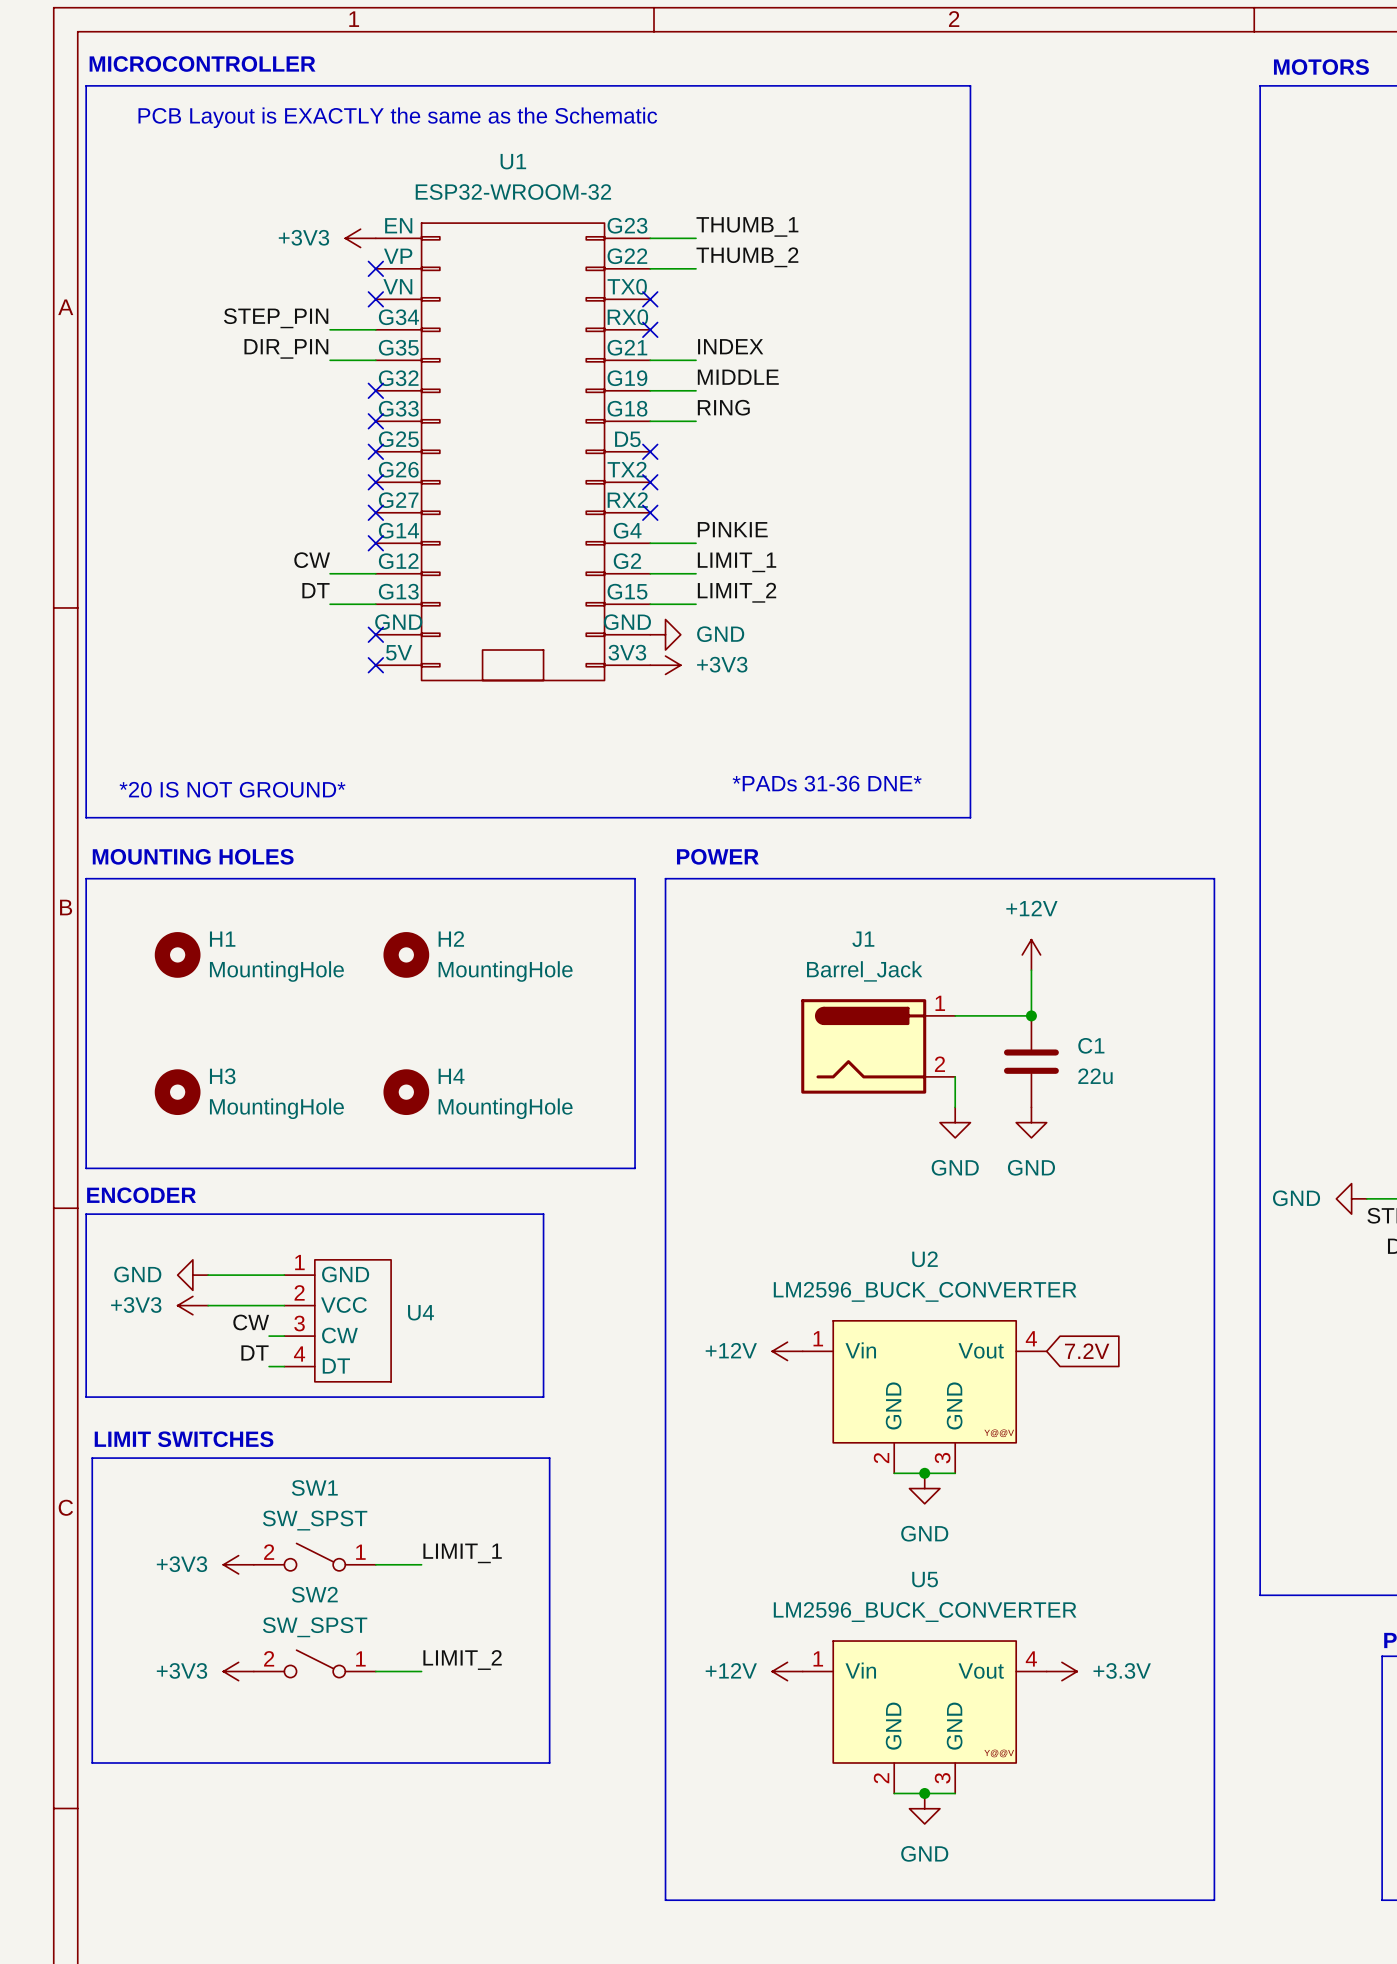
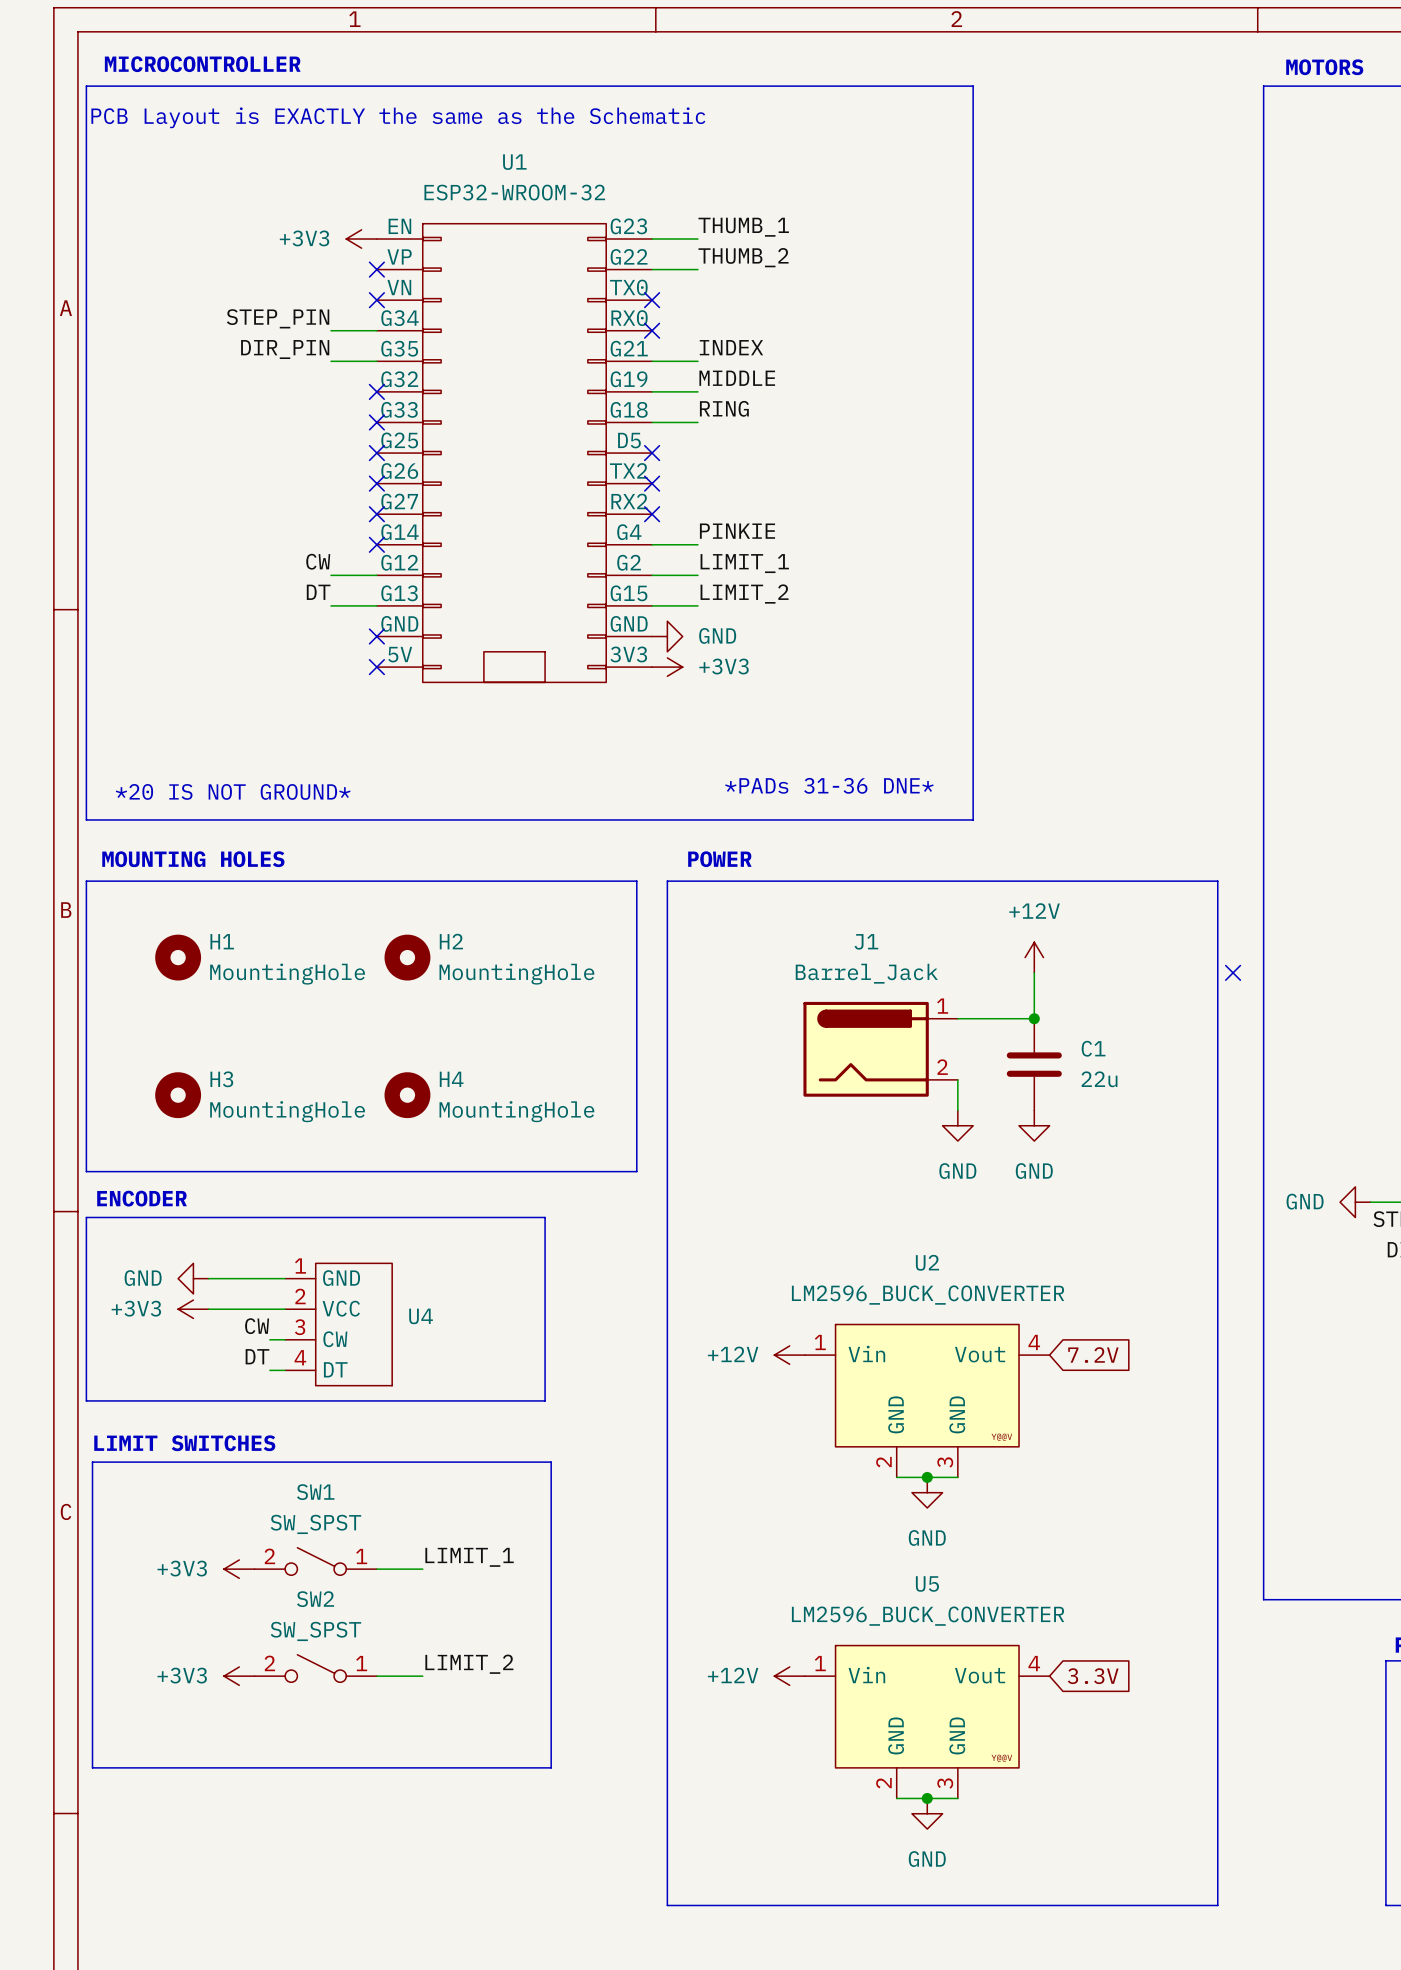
no-connect mark: none -> (1233, 972)
power symbol: +3.3V (1061, 1671) -> none
global label: none -> 3.3V (1093, 1676)

